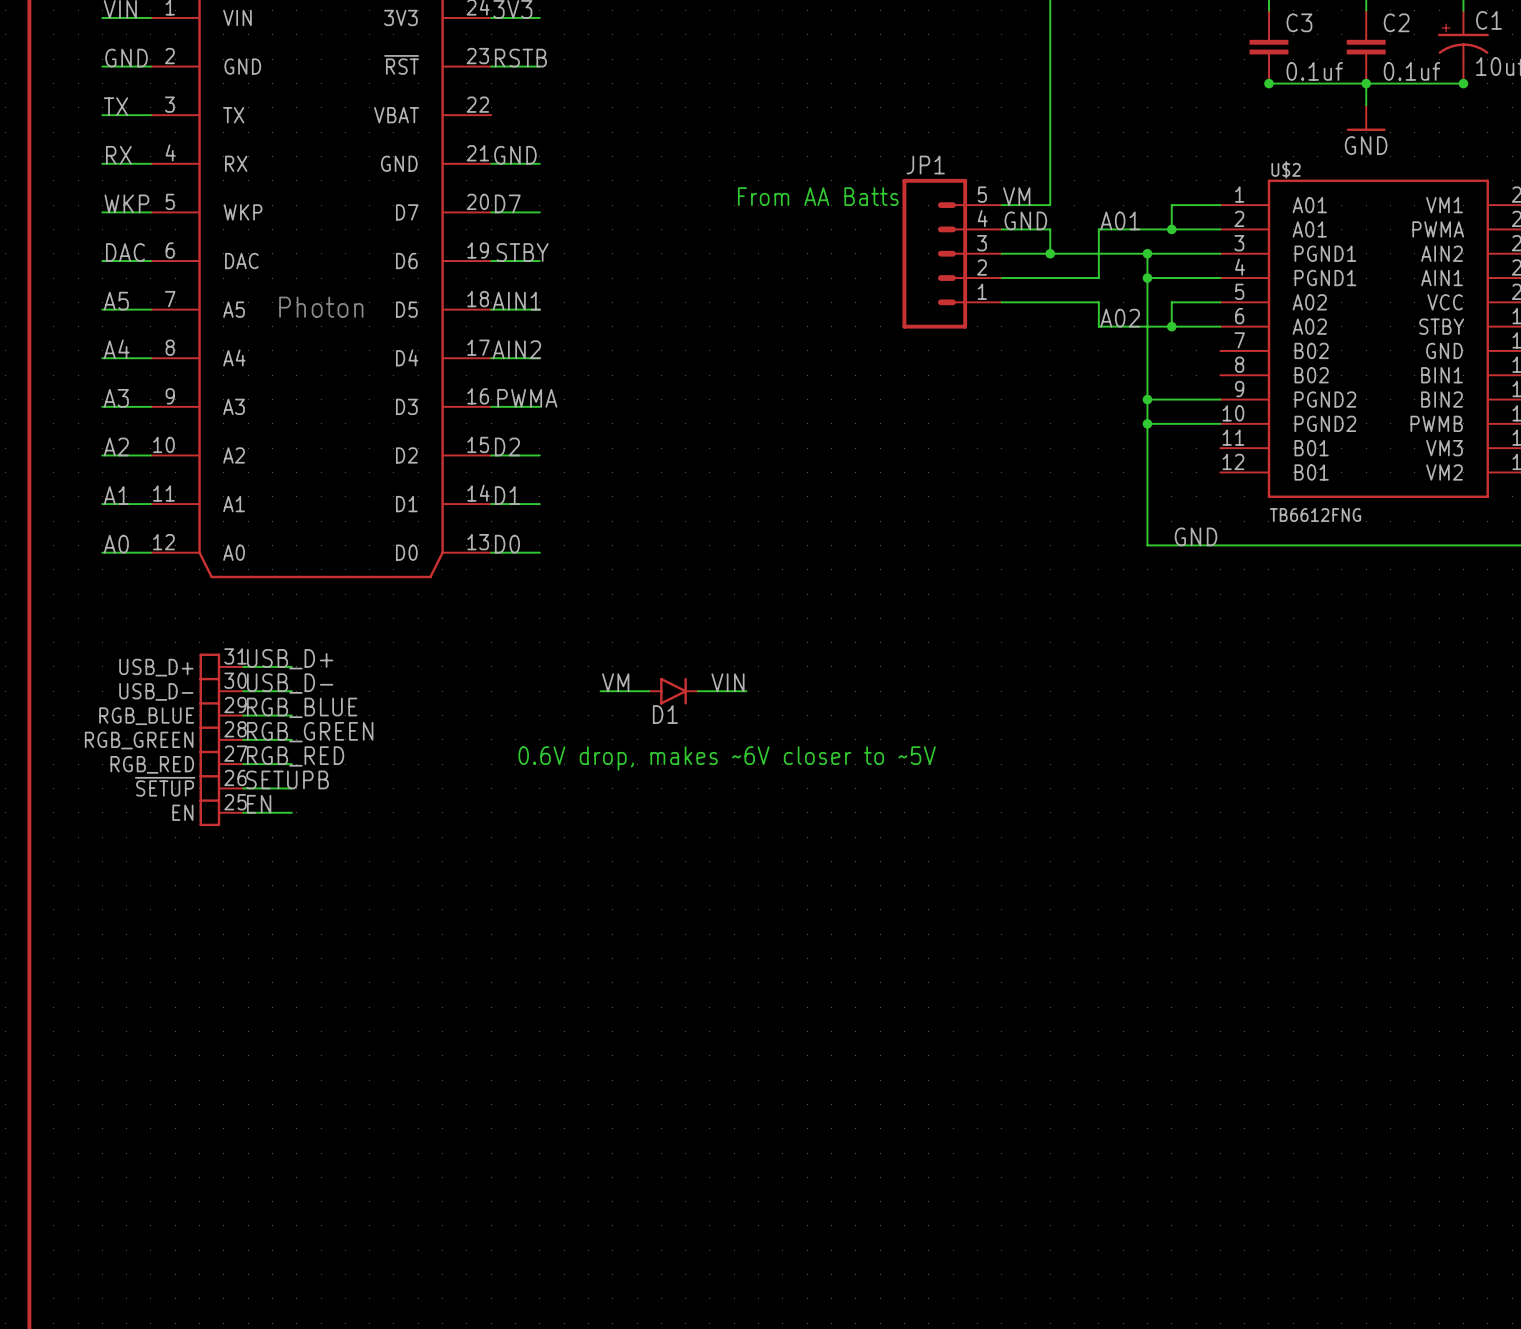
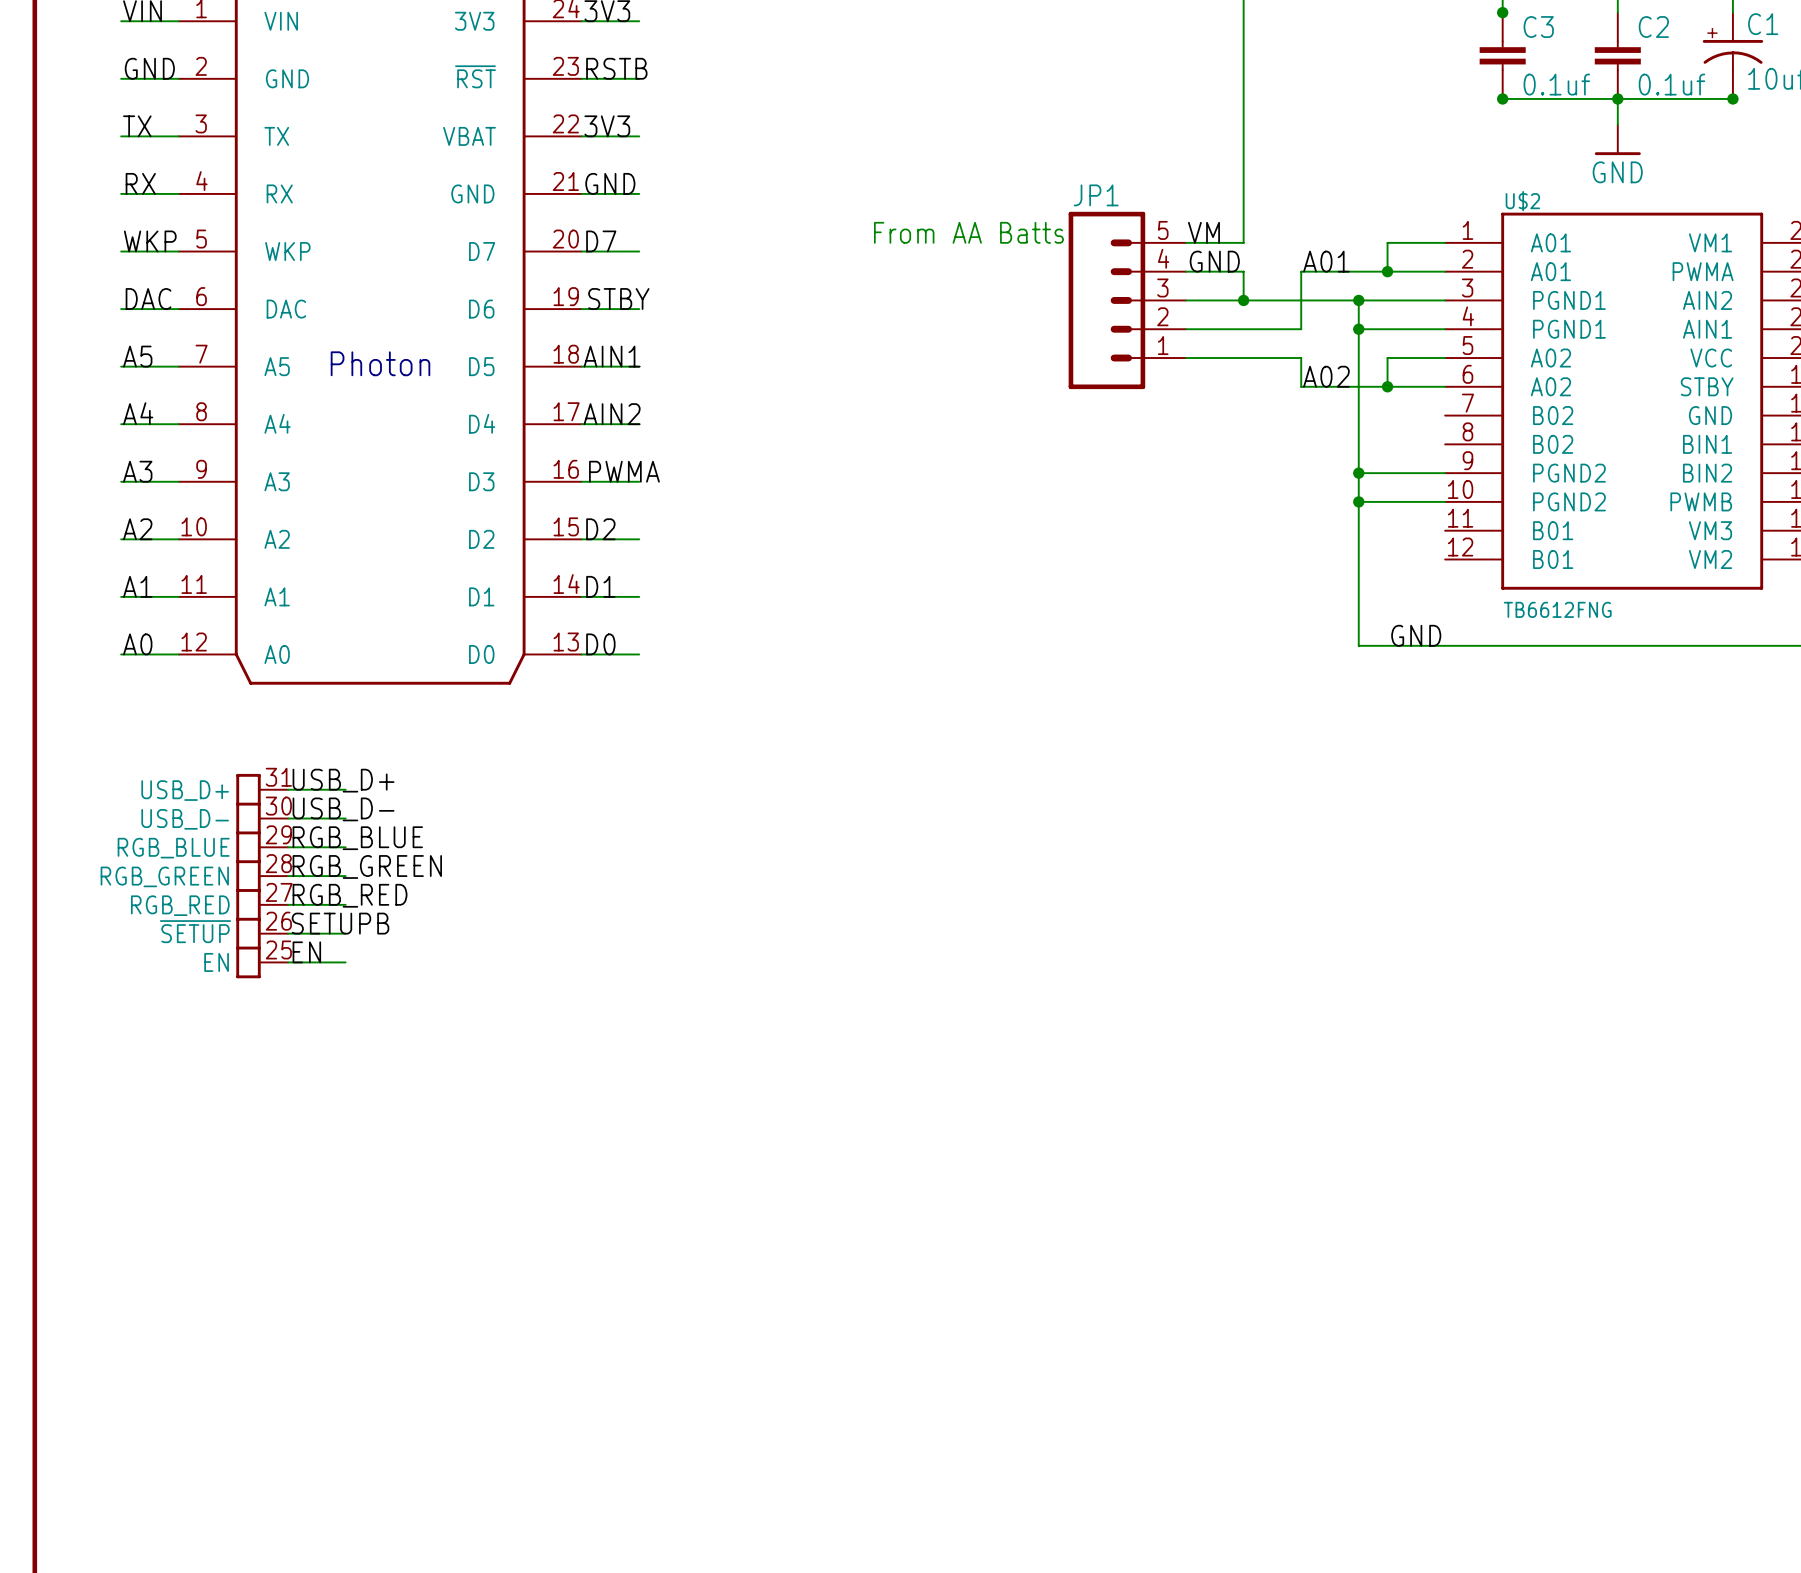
junction: none -> (1502, 12)
label: none -> 3V3 (607, 126)
wire: none -> (581, 136) (639, 136)
label: VM (615, 682) -> none
label: VIN (727, 682) -> none
wire: (600, 691) (649, 691) -> none
D1: (673, 691) -> none
wire: (697, 691) (746, 691) -> none
text: 0.6V drop, makes ~6V closer to ~5V (727, 758) -> none

